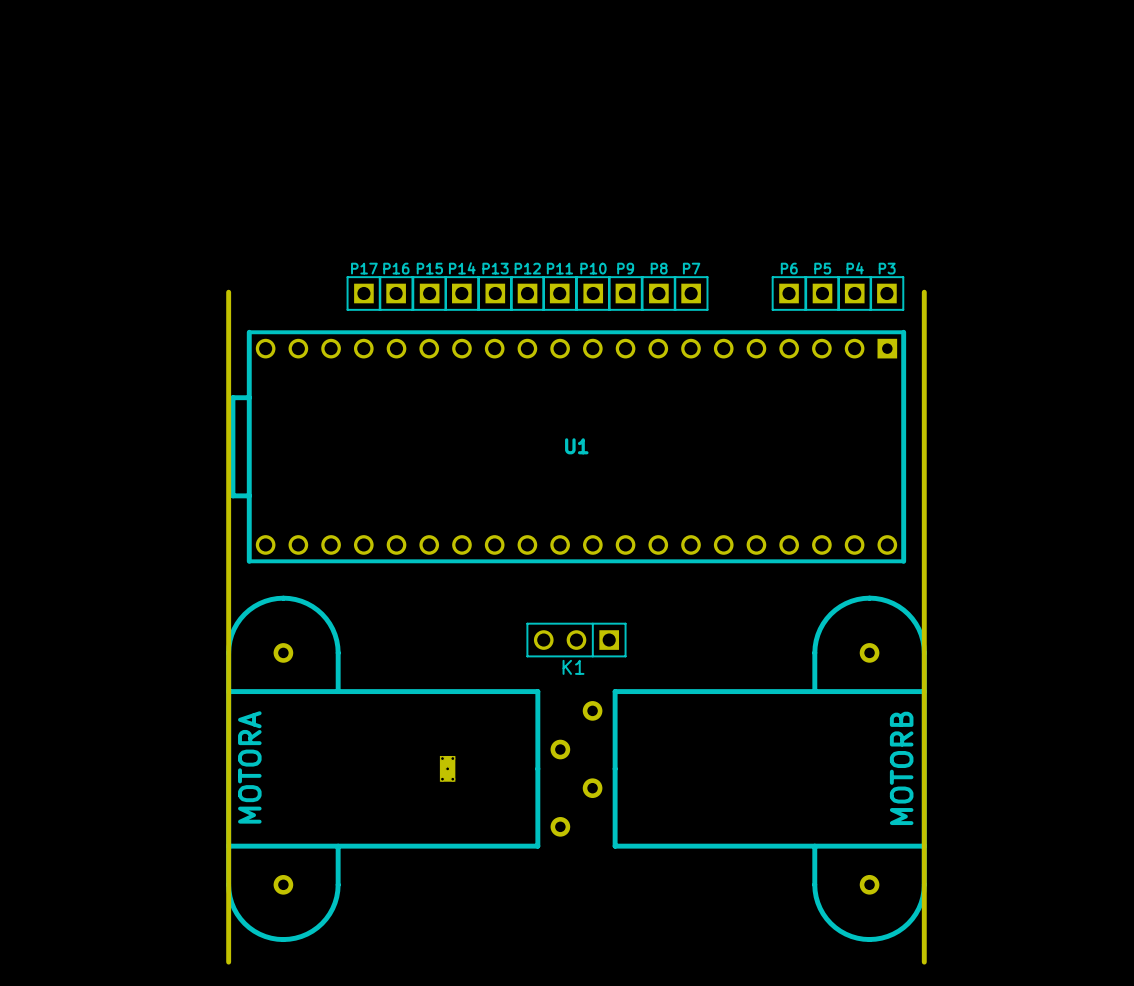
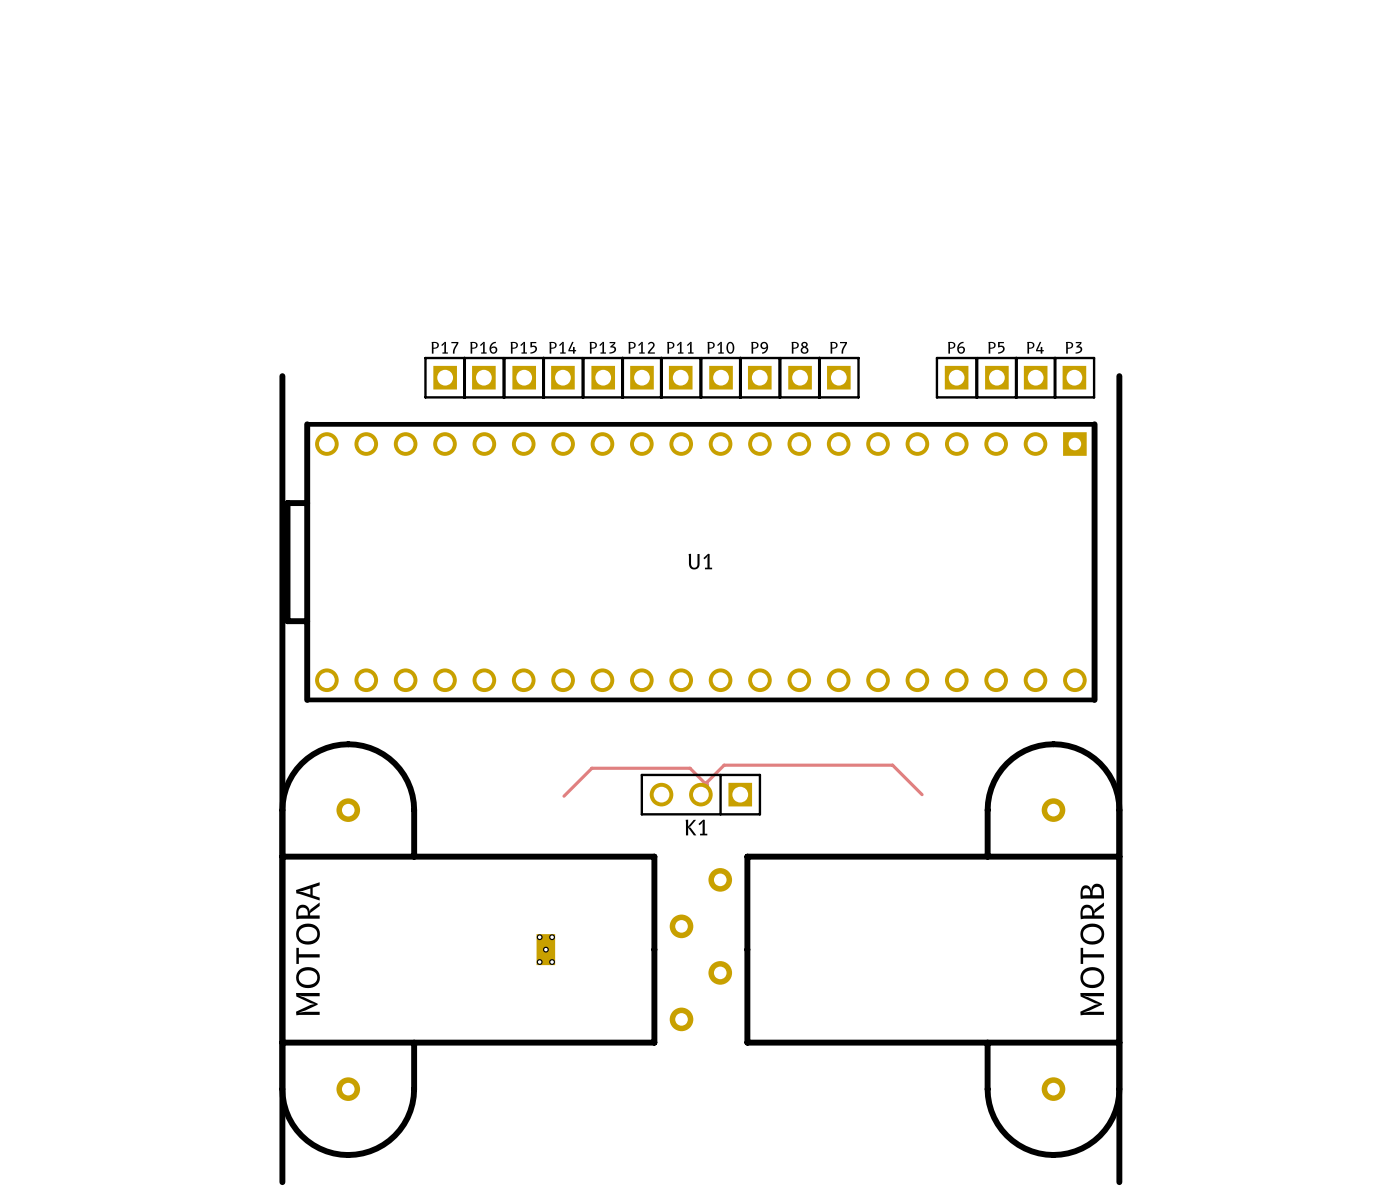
track: none -> (707, 785) (690, 768) (591, 768) (564, 796)
track: none -> (707, 794) (707, 782) (724, 765) (892, 765) (922, 794)

